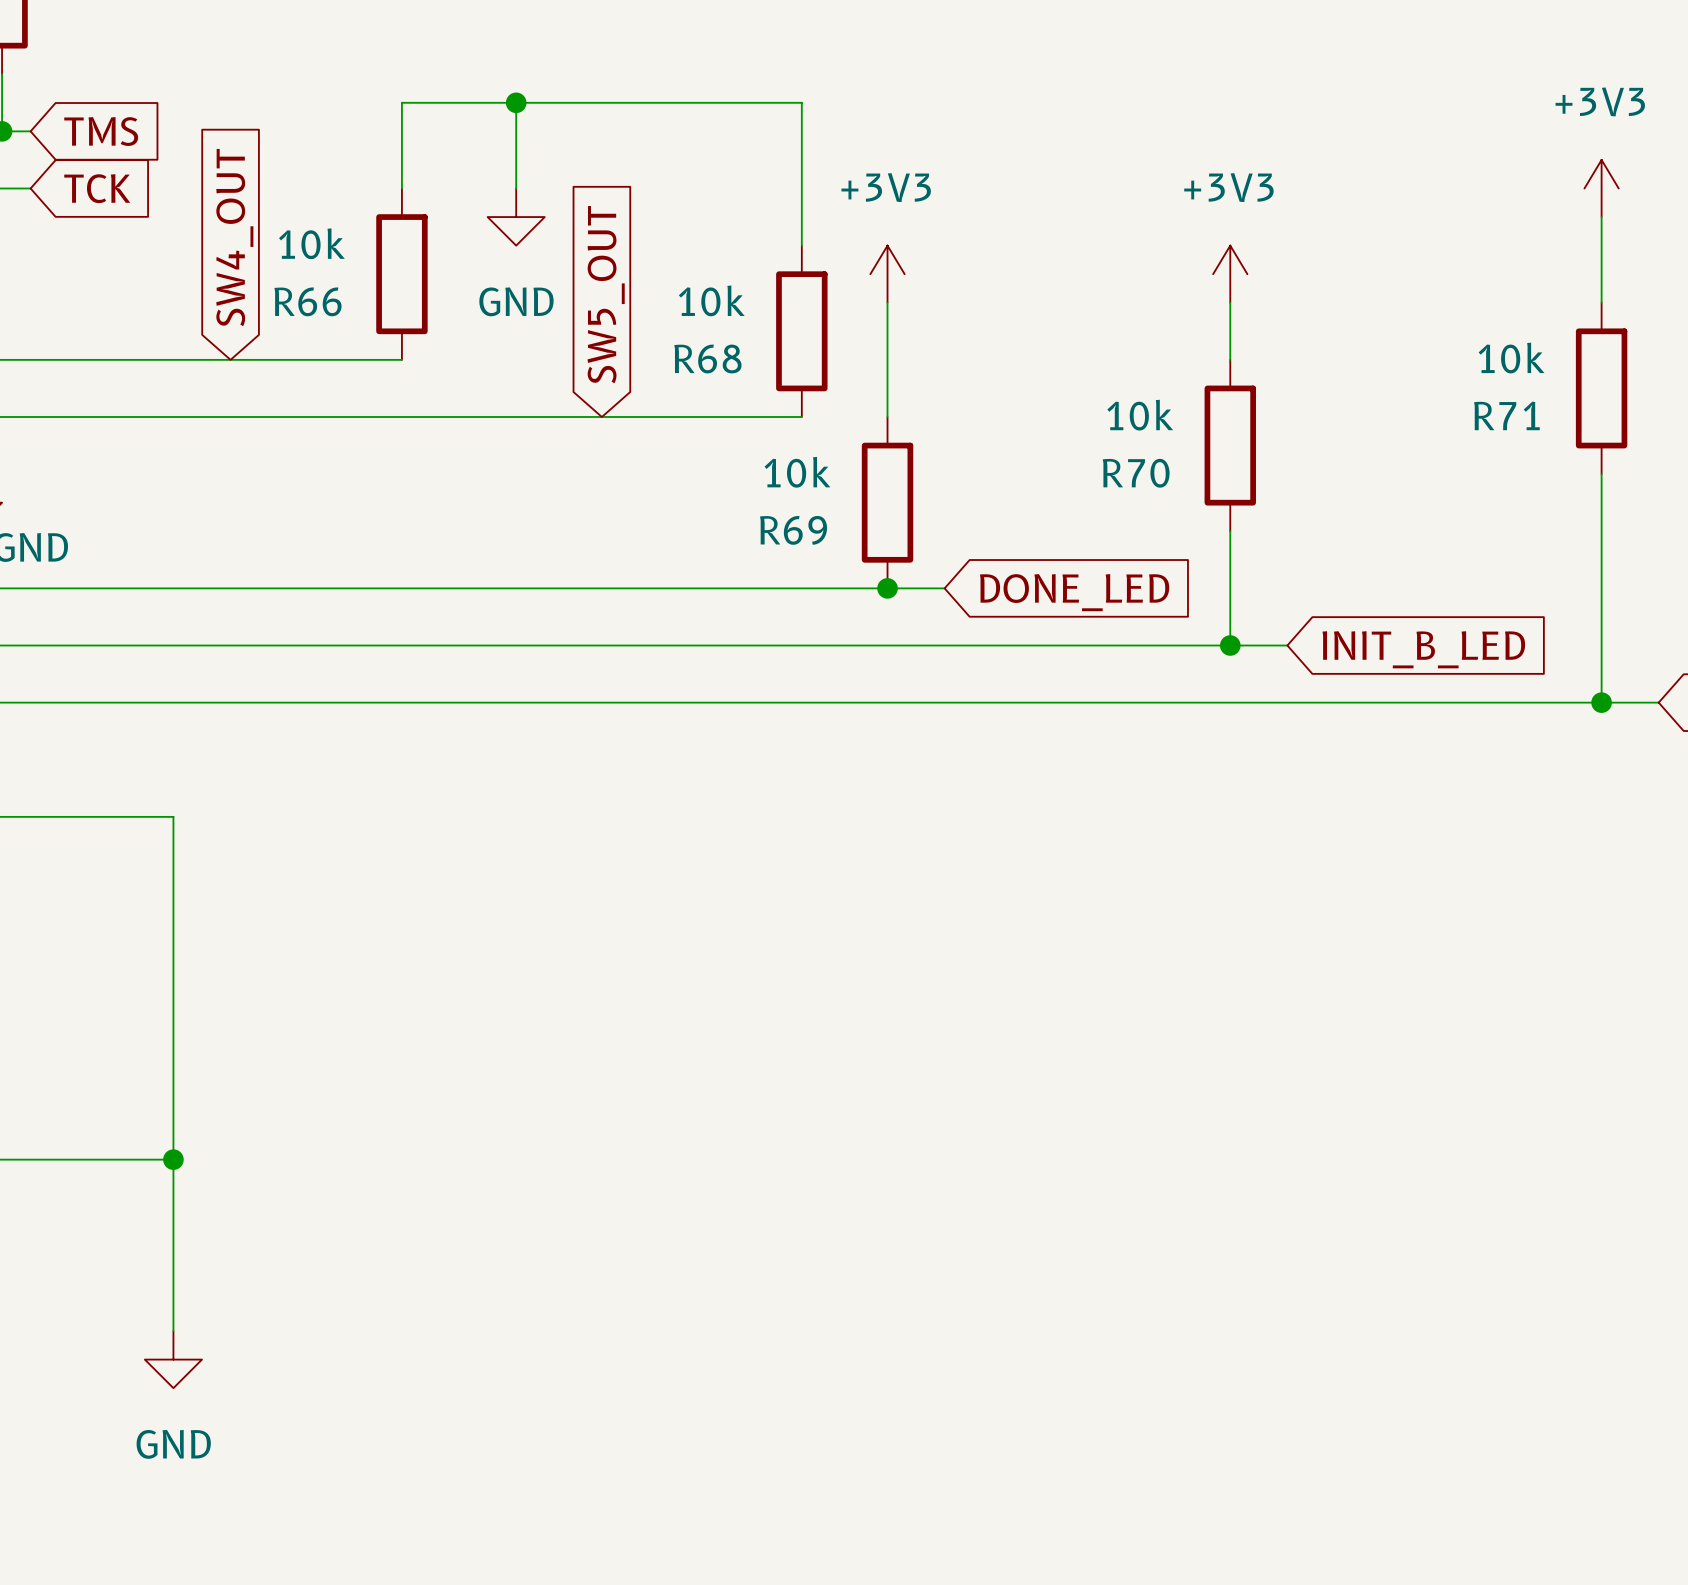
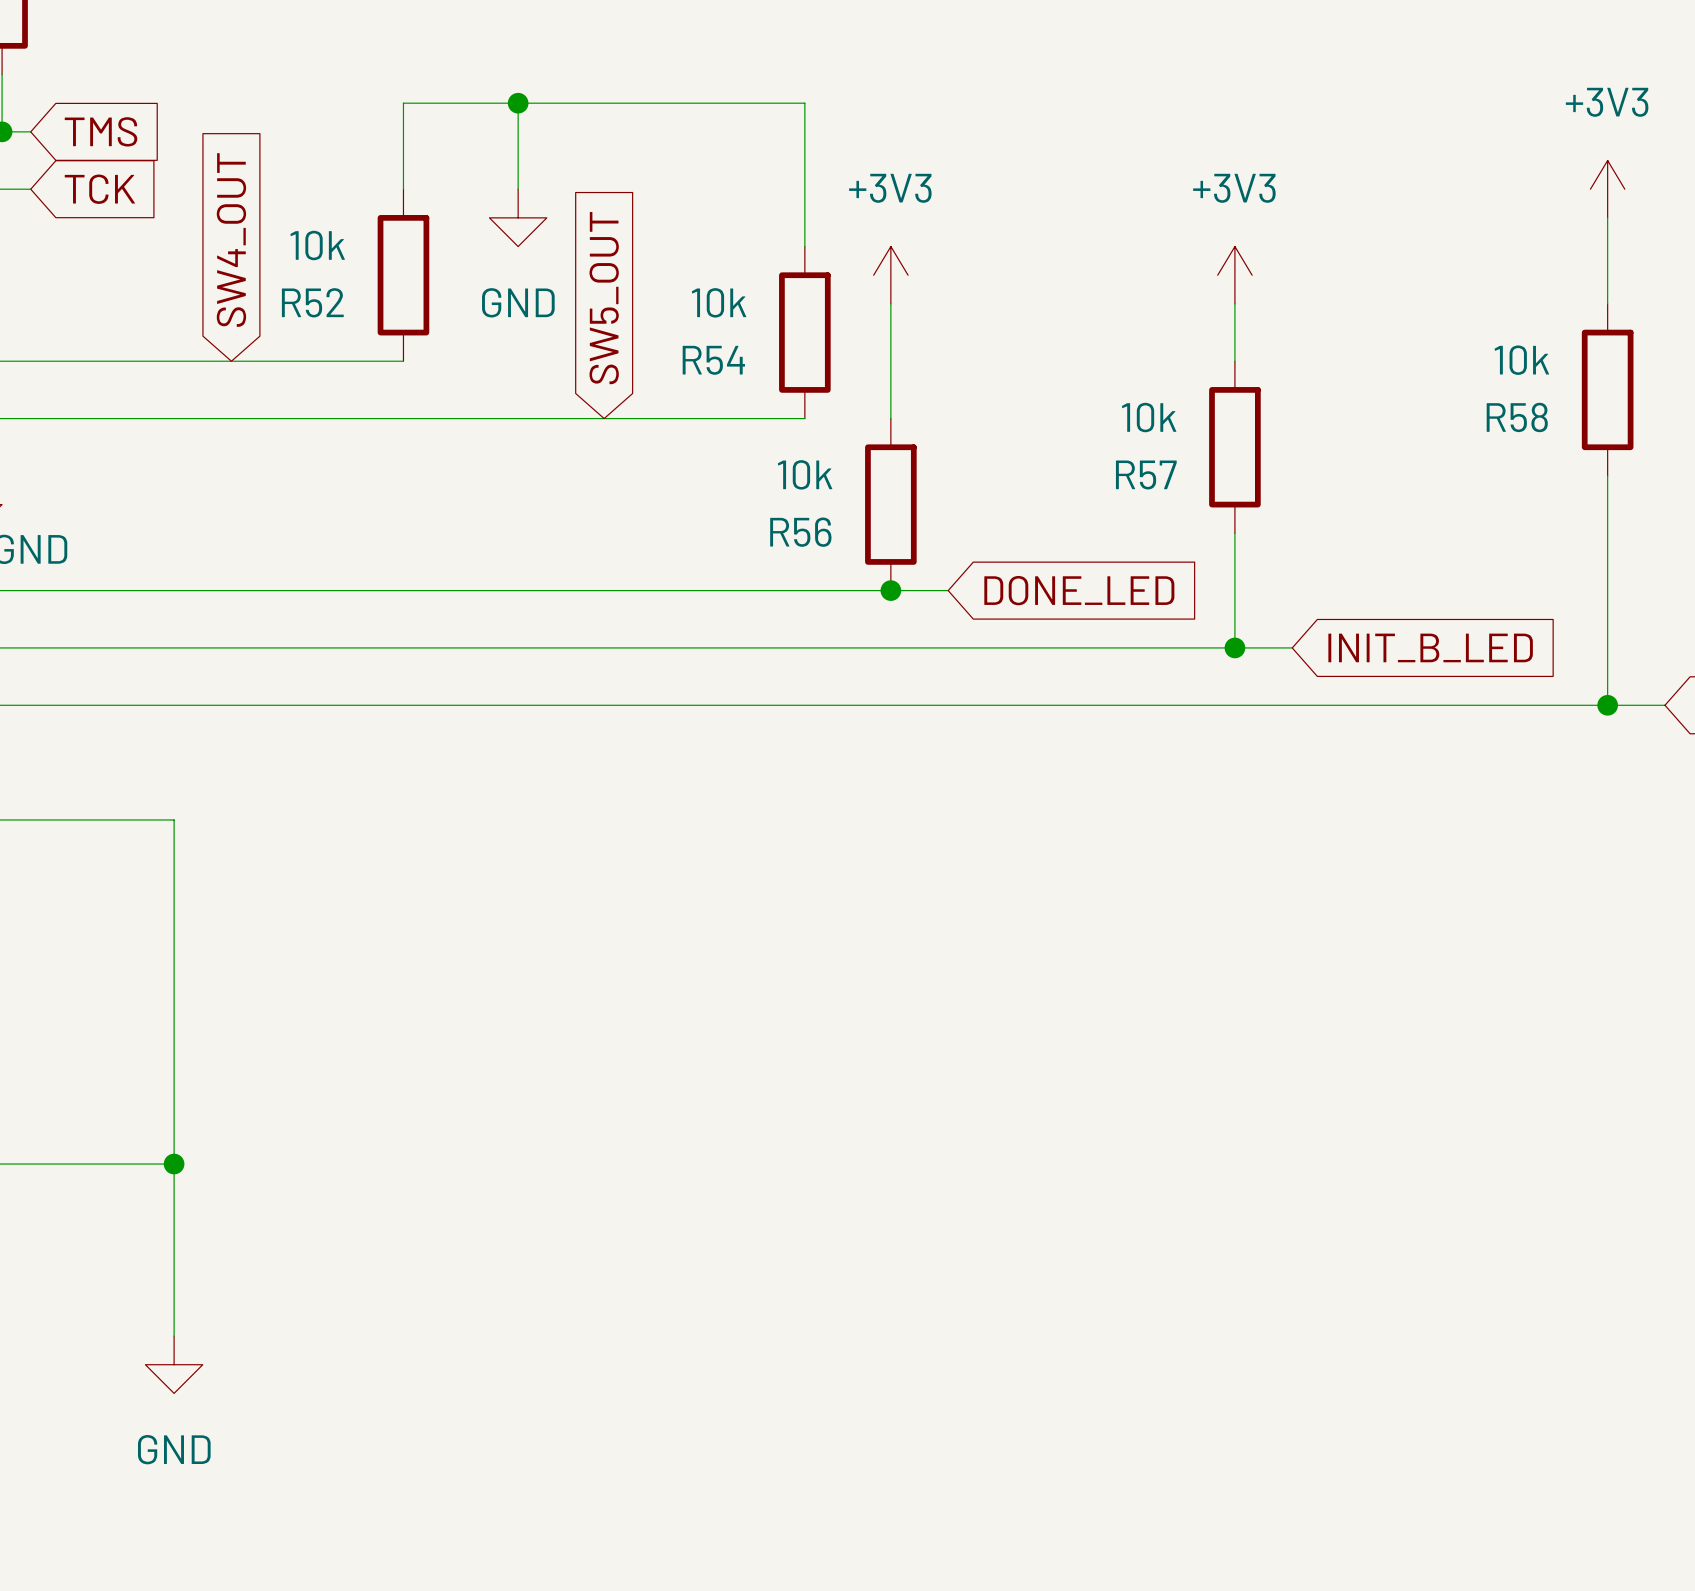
R66 name: R66 (308, 301) -> R52 (312, 302)
R68 name: R68 (707, 358) -> R54 (713, 360)
R71 name: R71 (1506, 415) -> R58 (1517, 417)
R70 name: R70 (1136, 473) -> R57 (1146, 474)
R69 name: R69 (793, 530) -> R56 (800, 532)

